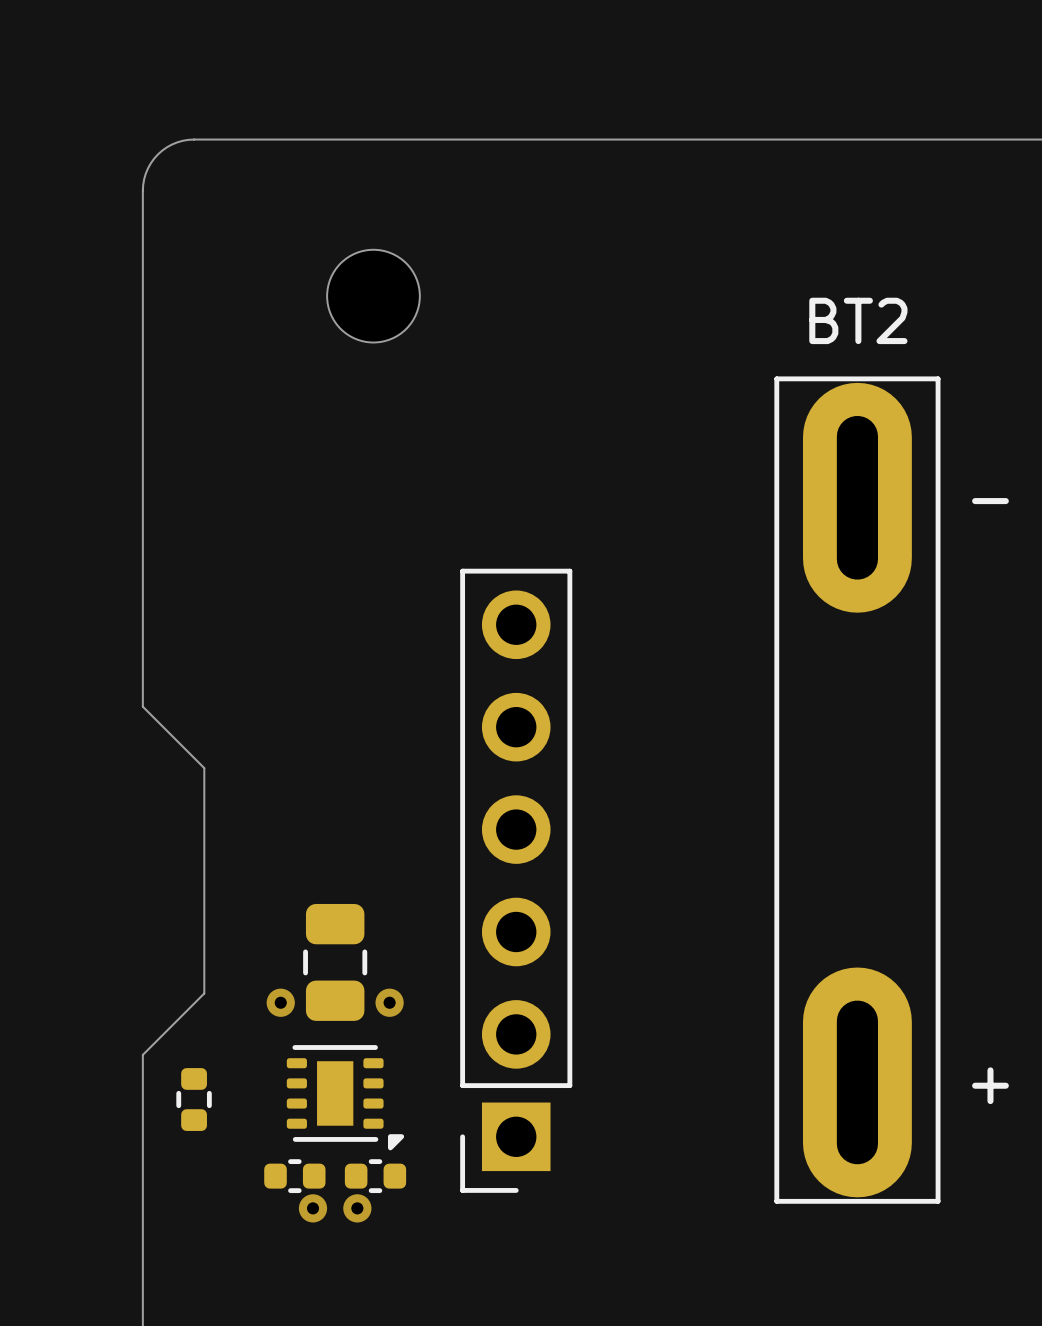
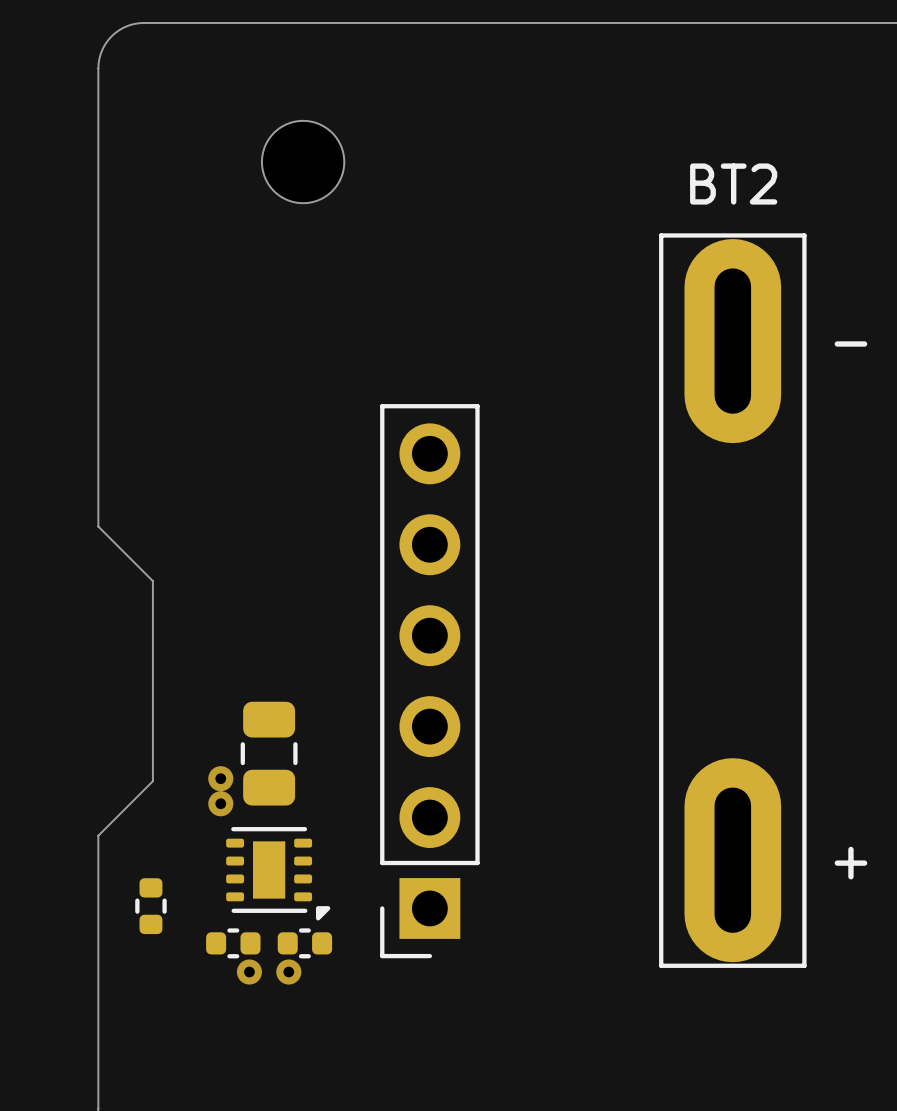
via: none -> (220, 778)
via: (280, 1002) -> none
via: (389, 1002) -> none
via: none -> (220, 803)
part position: (194, 1099) -> (150, 906)

